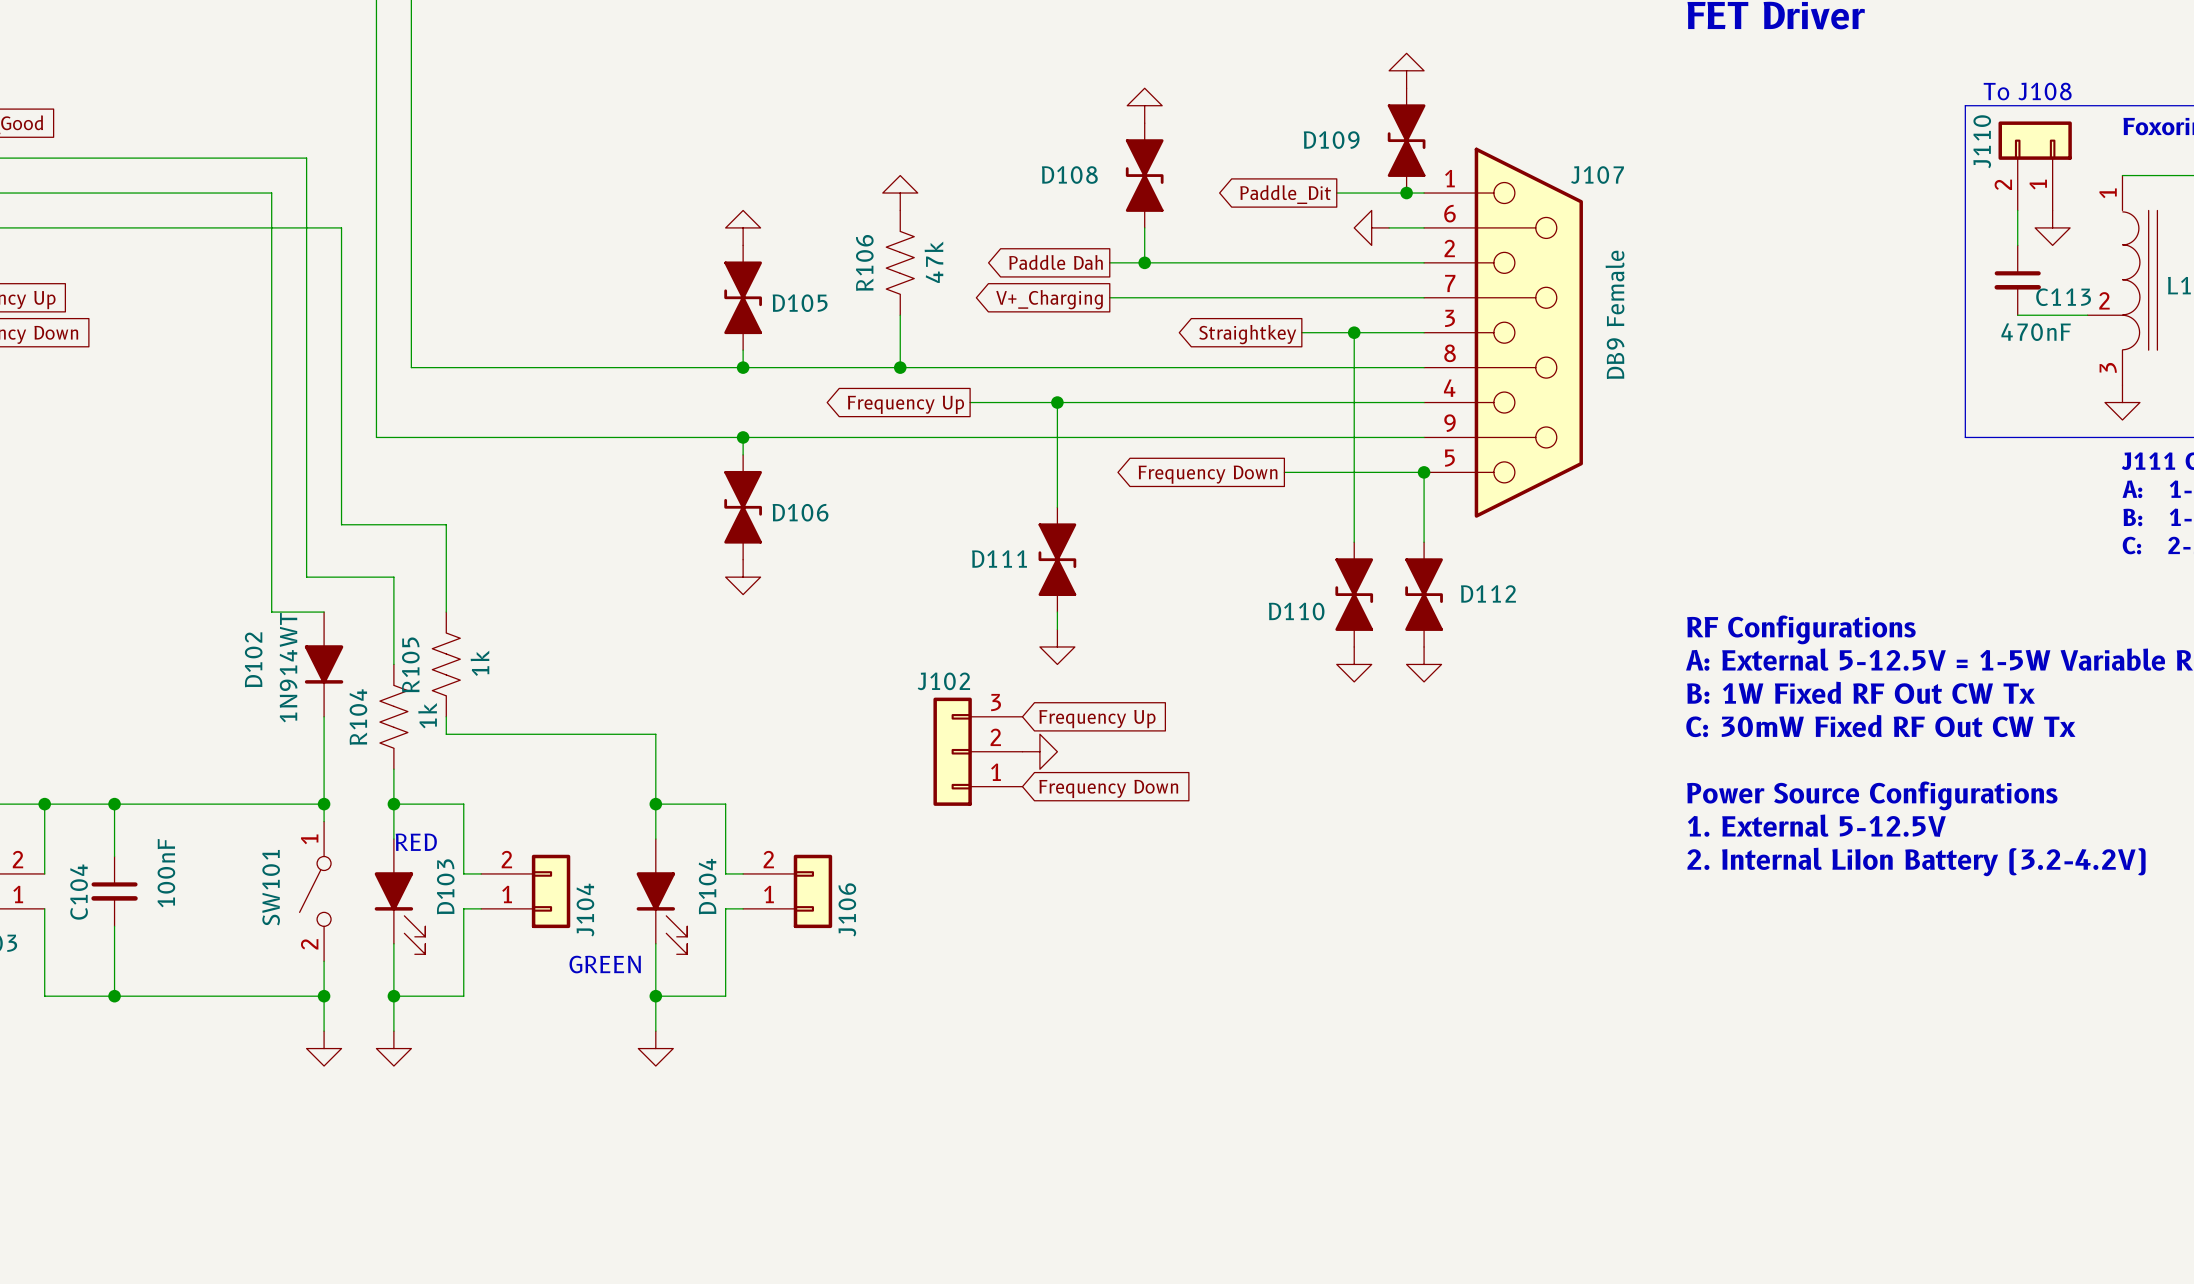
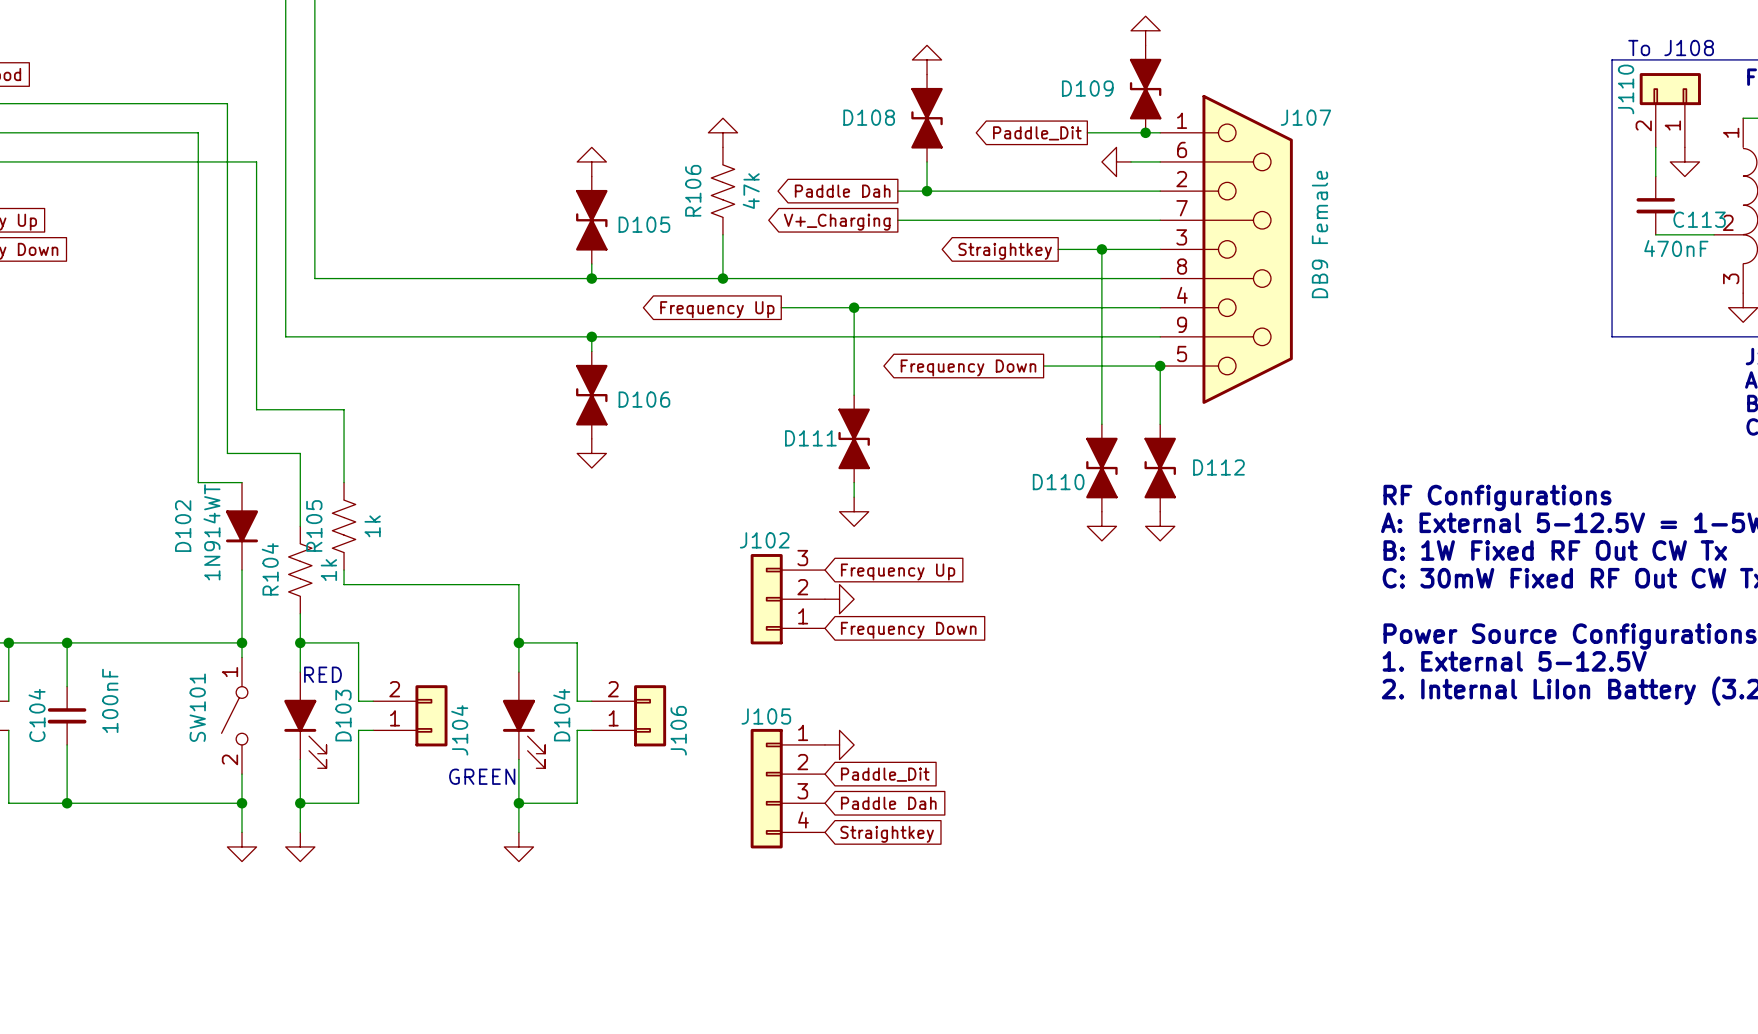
power symbol: none -> (839, 744)
global label: none -> Paddle_Dit (885, 774)
J105: none -> (787, 788)
global label: none -> Paddle Dah (888, 803)
global label: none -> Straightkey (887, 834)

